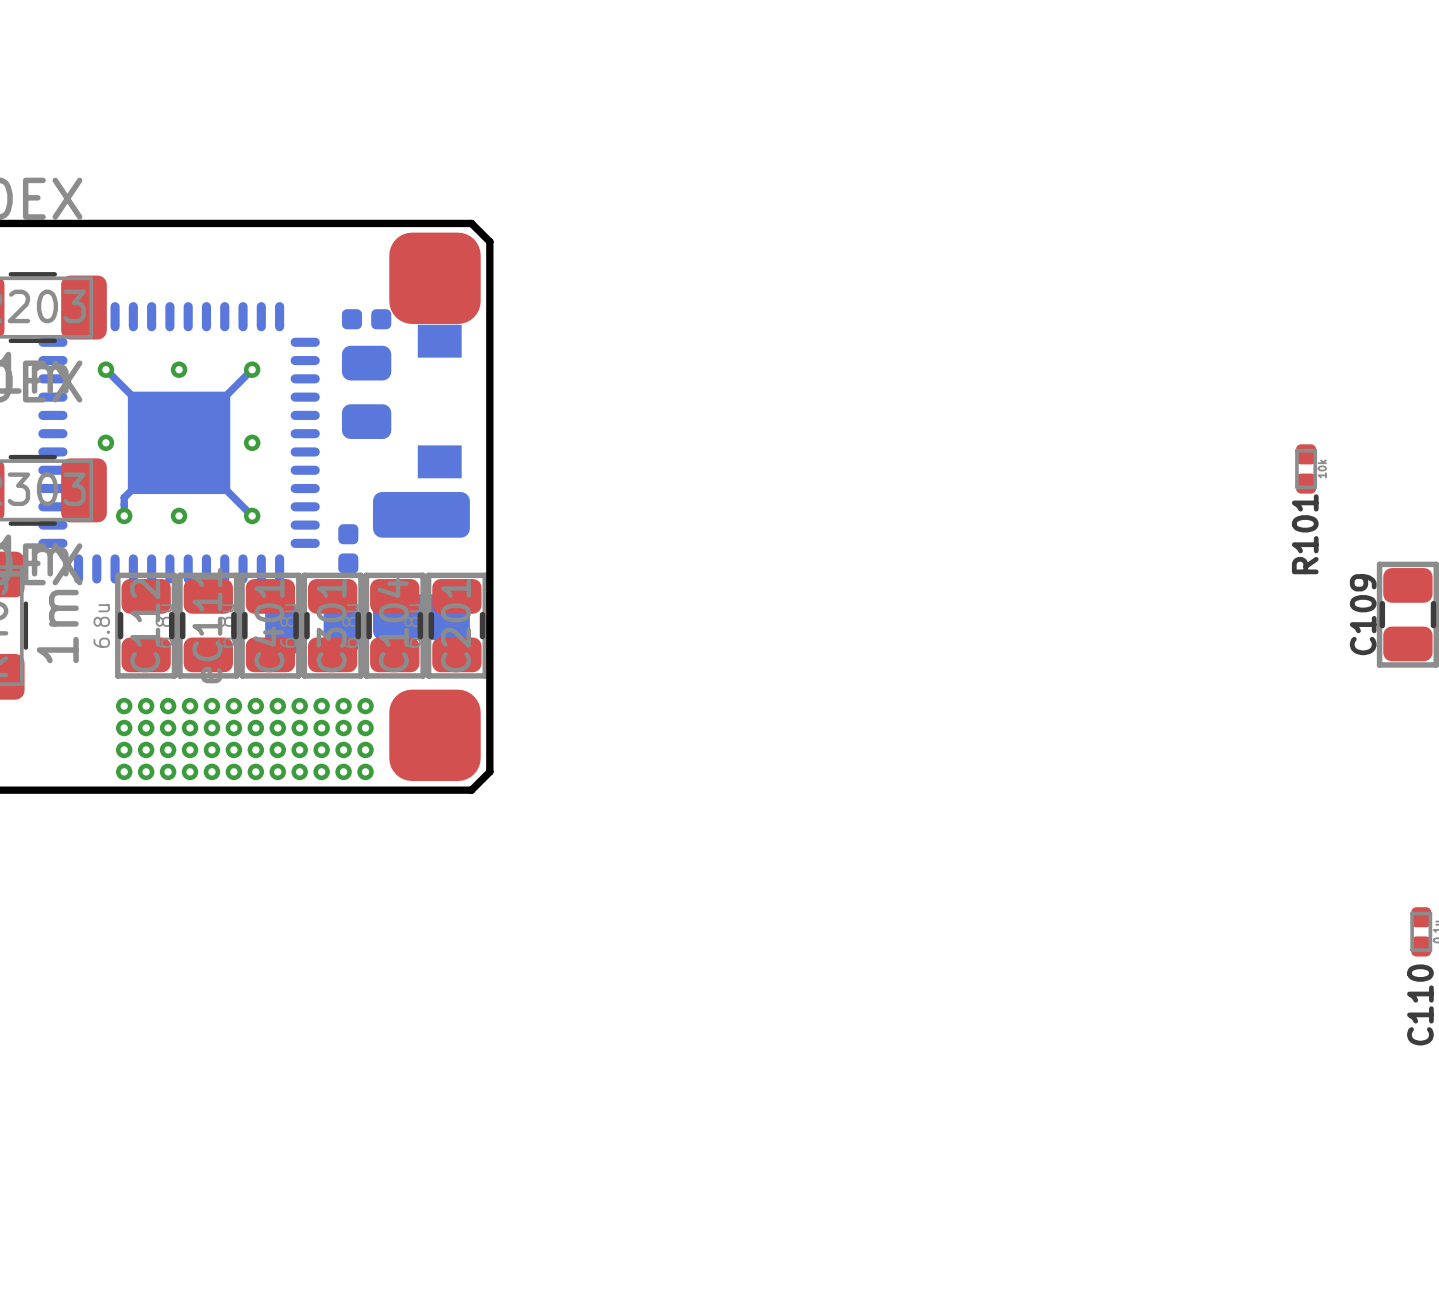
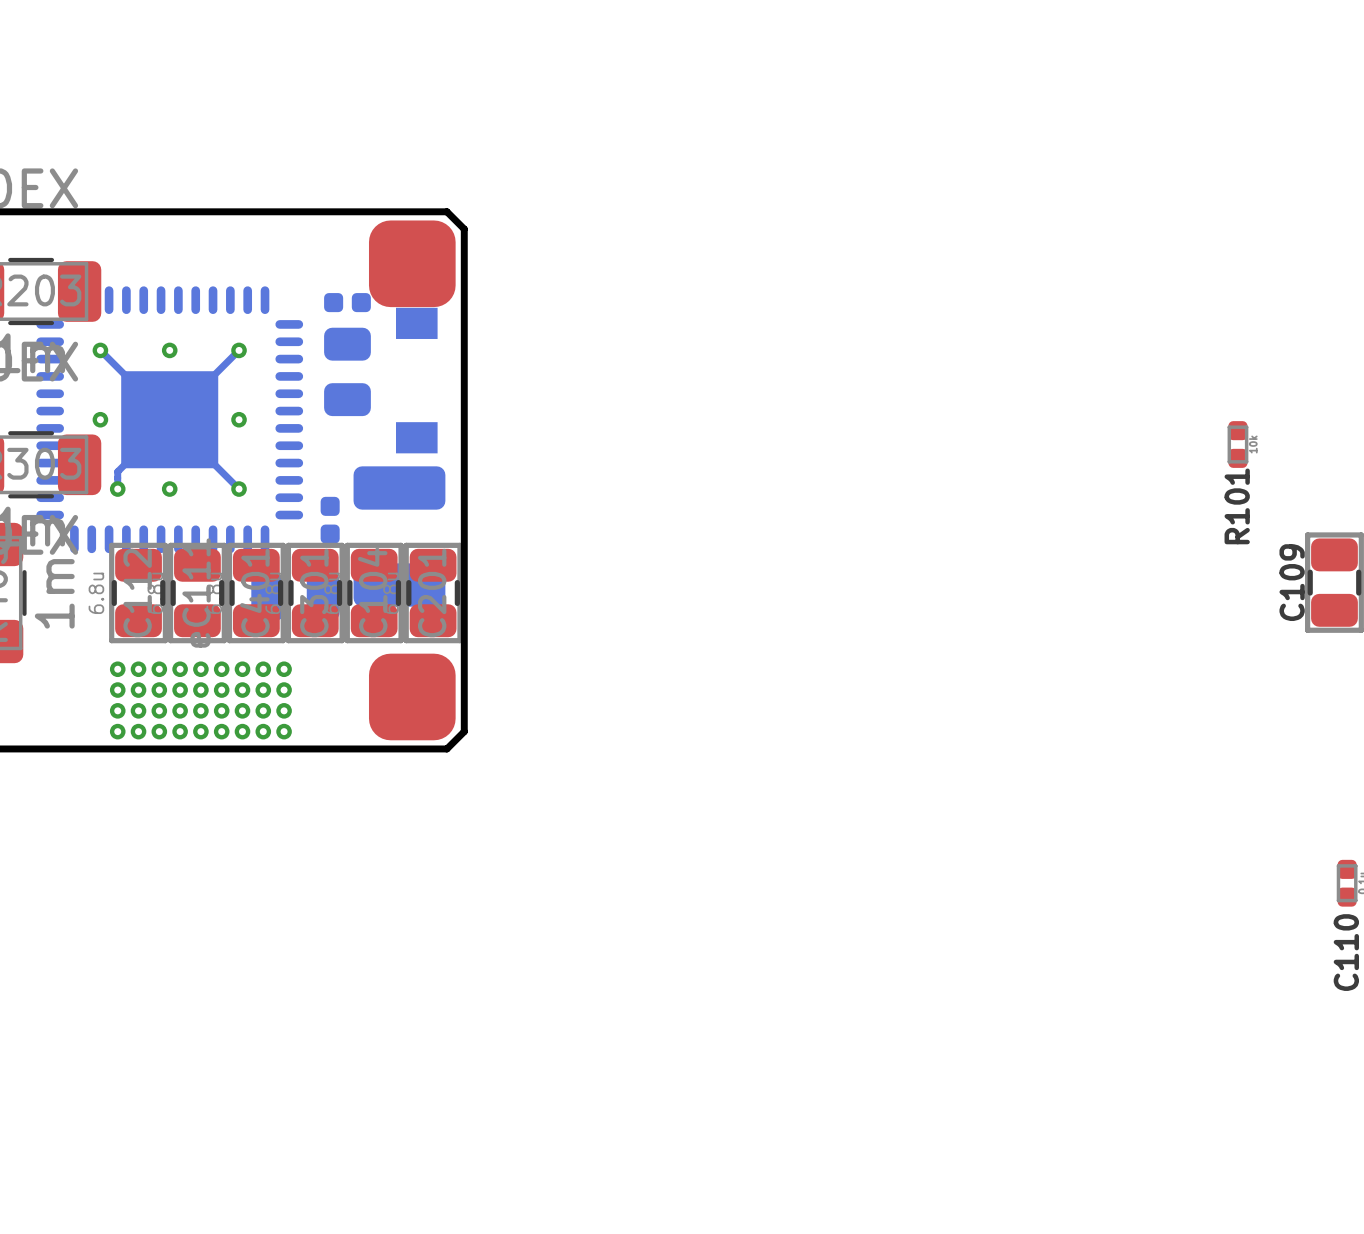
via: (321, 706) -> none
via: (343, 706) -> none
via: (365, 706) -> none
via: (321, 728) -> none
via: (343, 728) -> none
via: (365, 728) -> none
via: (321, 749) -> none
via: (343, 749) -> none
via: (365, 749) -> none
via: (321, 771) -> none
via: (343, 771) -> none
via: (365, 771) -> none

